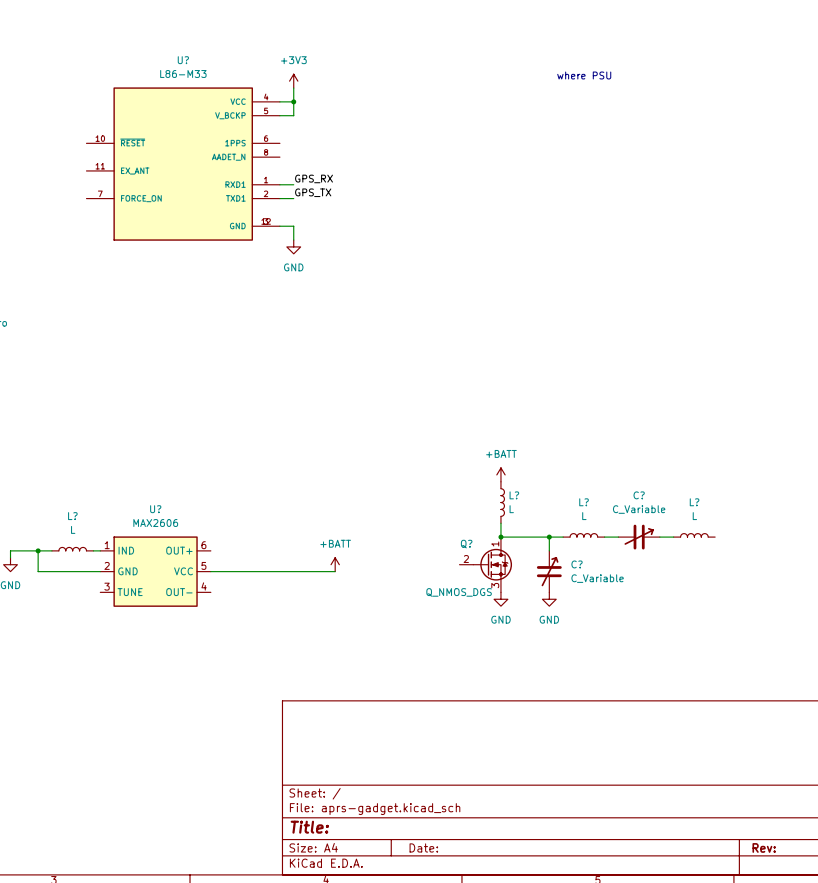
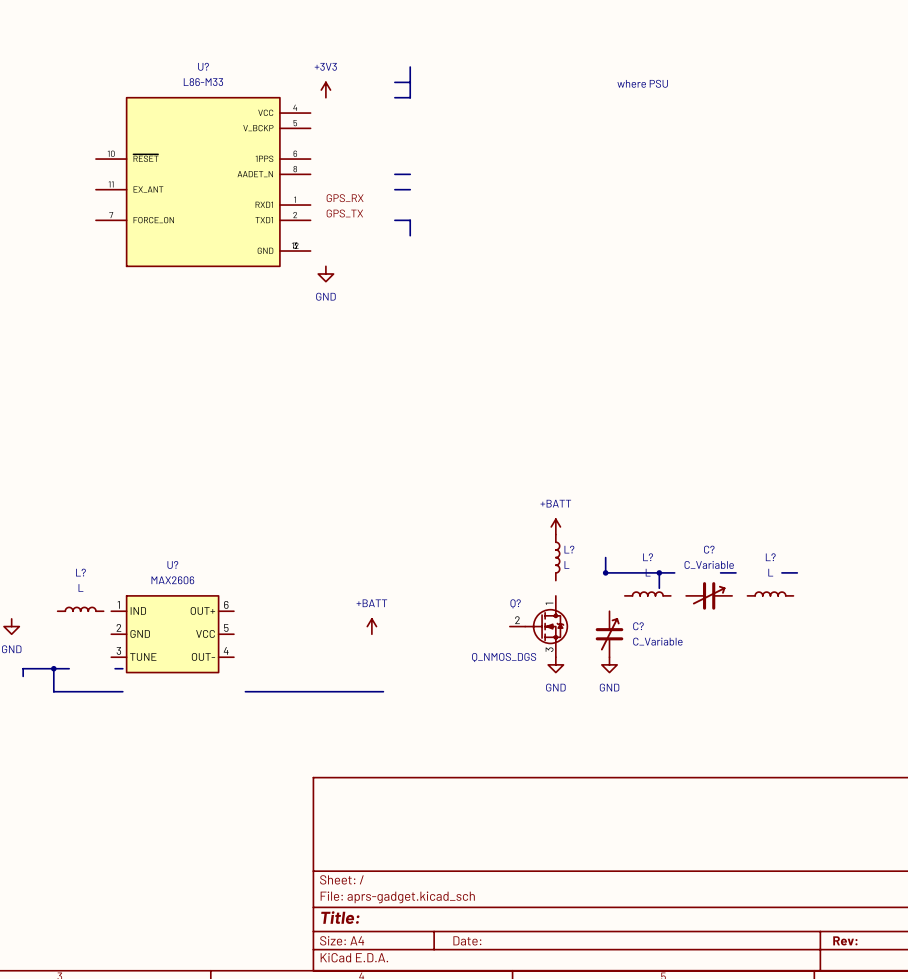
wire: (293, 88) (293, 115) (279, 115) -> (410, 67) (410, 97) (394, 97)
wire: (279, 101) (293, 101) -> (394, 82) (410, 82)
junction: (293, 101) -> none
wire: (279, 184) (293, 184) -> (394, 174) (410, 174)
wire: (279, 198) (293, 198) -> (394, 189) (410, 189)
wire: (279, 226) (293, 226) (293, 240) -> (394, 220) (410, 220) (410, 235)
junction: none -> (659, 572)
wire: (500, 523) (500, 537) (563, 537) -> (605, 557) (605, 572) (674, 572)
junction: (500, 537) -> none
wire: (549, 537) (549, 550) -> (659, 572) (659, 588)
junction position: (549, 537) -> (605, 572)
wire: (604, 537) (618, 537) -> (720, 572) (735, 572)
wire: (659, 537) (673, 537) -> (781, 572) (797, 572)
wire: (38, 550) (38, 571) (100, 571) -> (53, 668) (53, 691) (122, 691)
junction: (38, 550) -> none
wire: (51, 550) (10, 550) (10, 557) -> (69, 668) (23, 668) (23, 676)
wire: (93, 550) (100, 550) -> (115, 668) (122, 668)
wire: (210, 571) (335, 571) -> (245, 691) (383, 691)
junction: none -> (53, 668)

